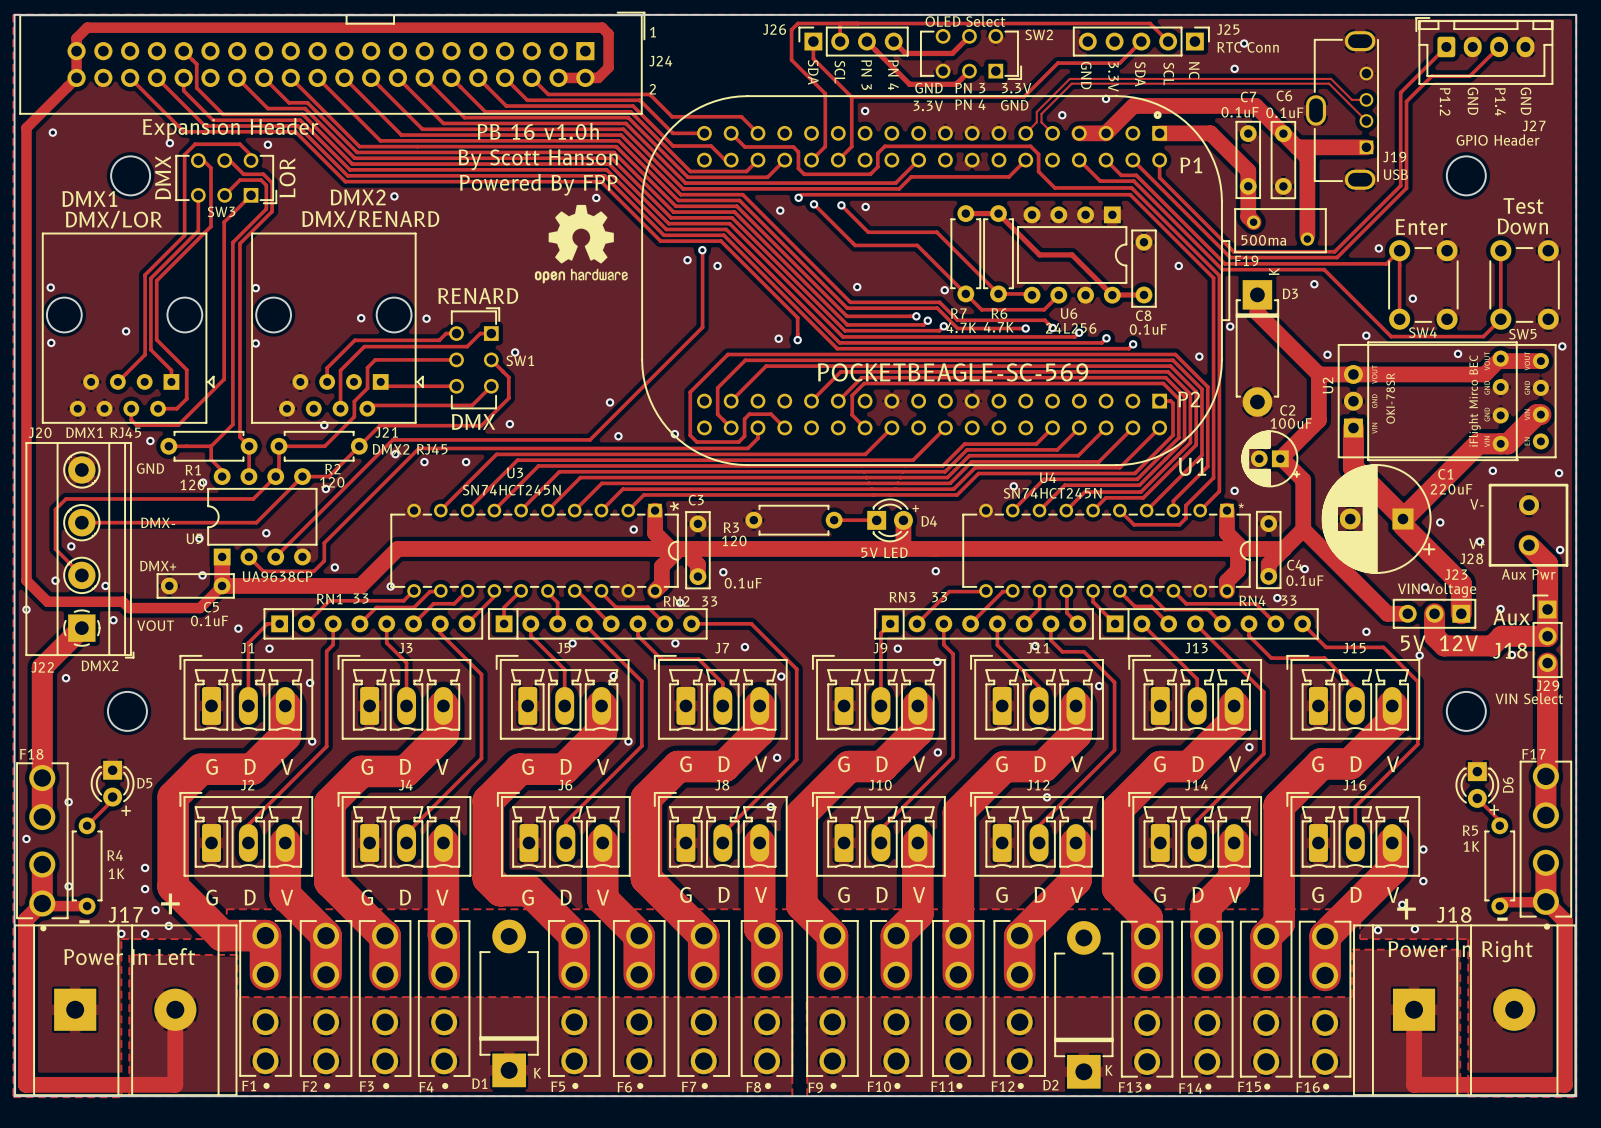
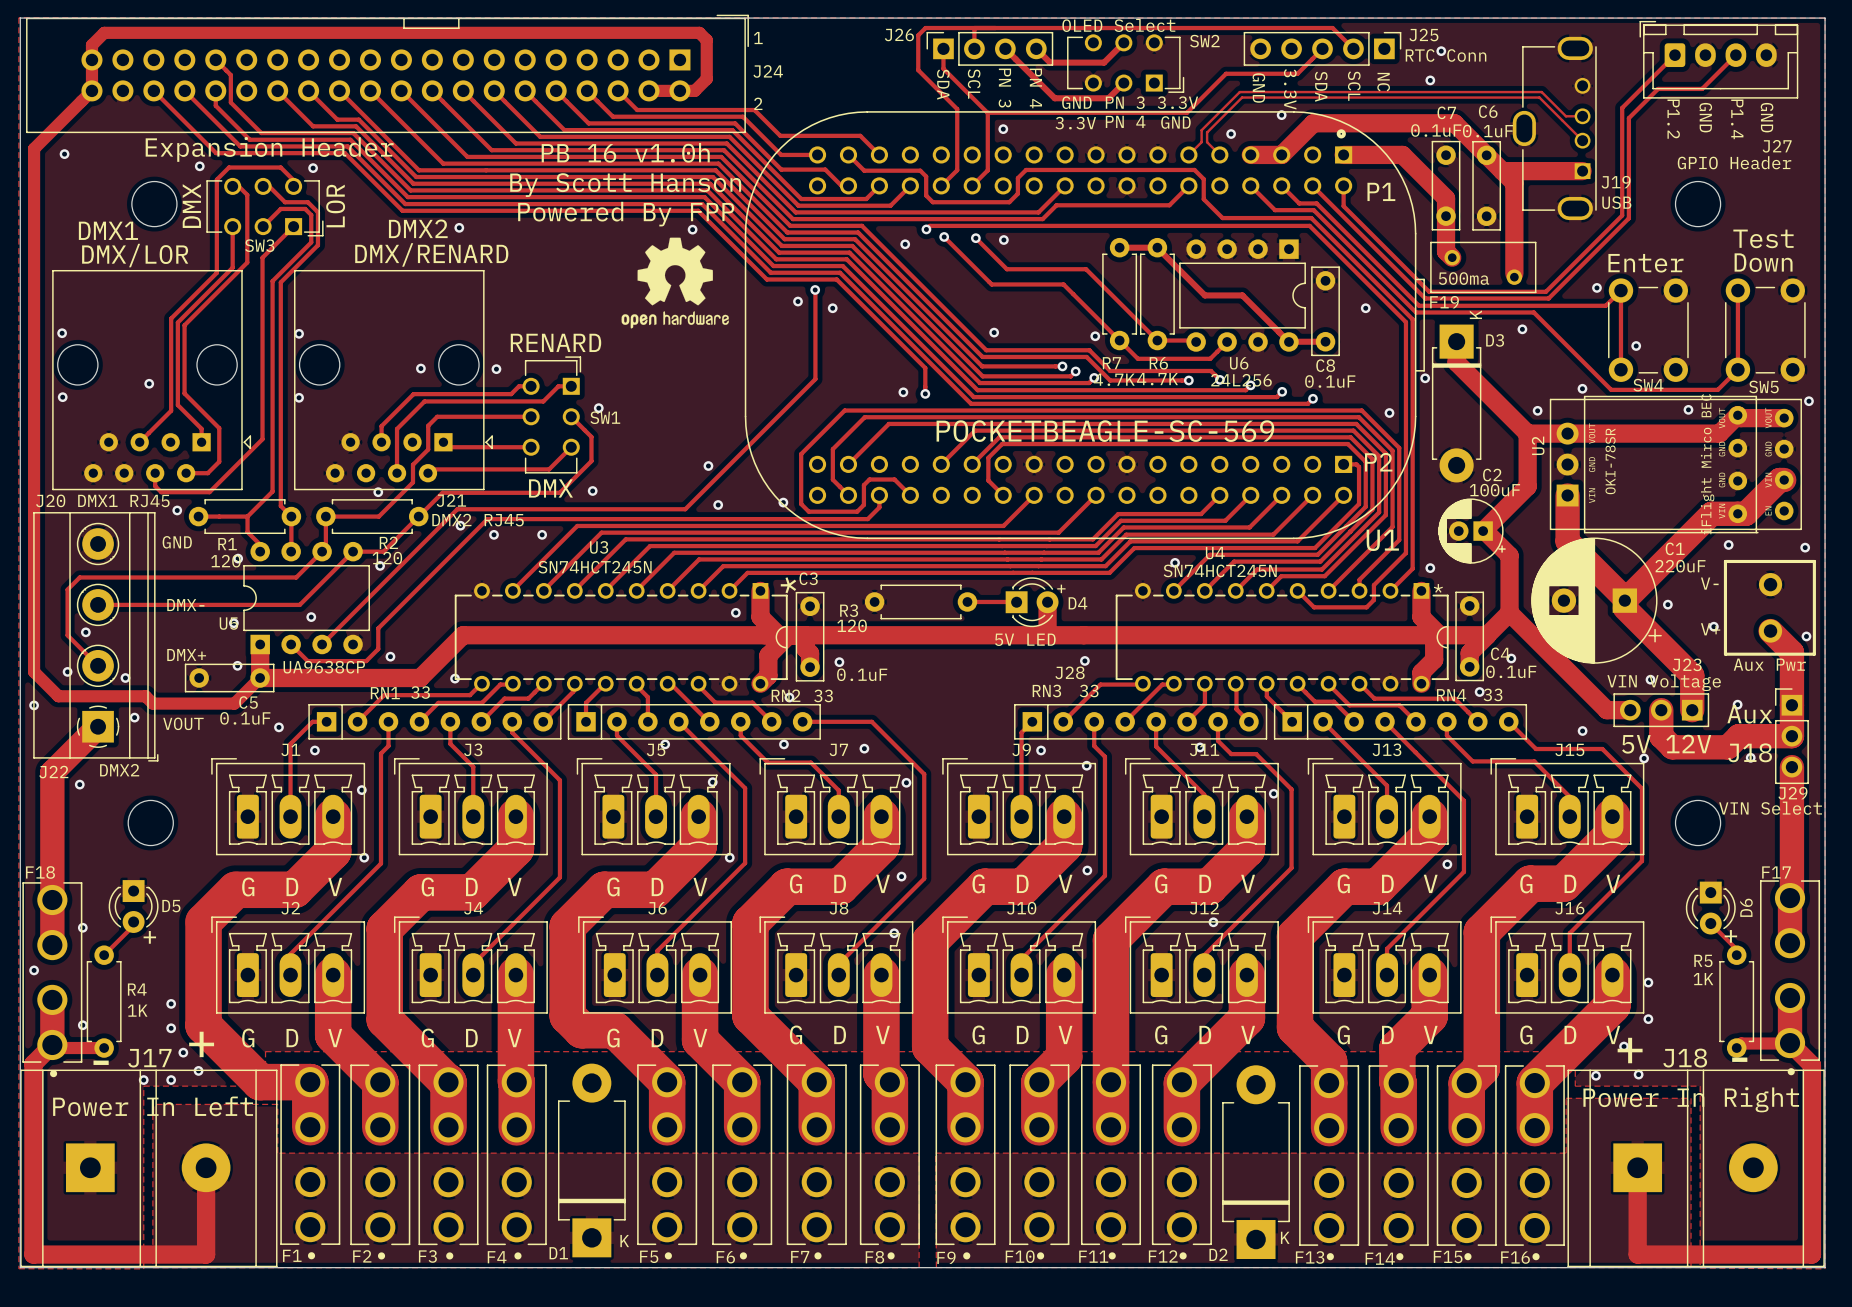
J28 name position: J28 (1471, 558) -> J28 (1070, 672)

